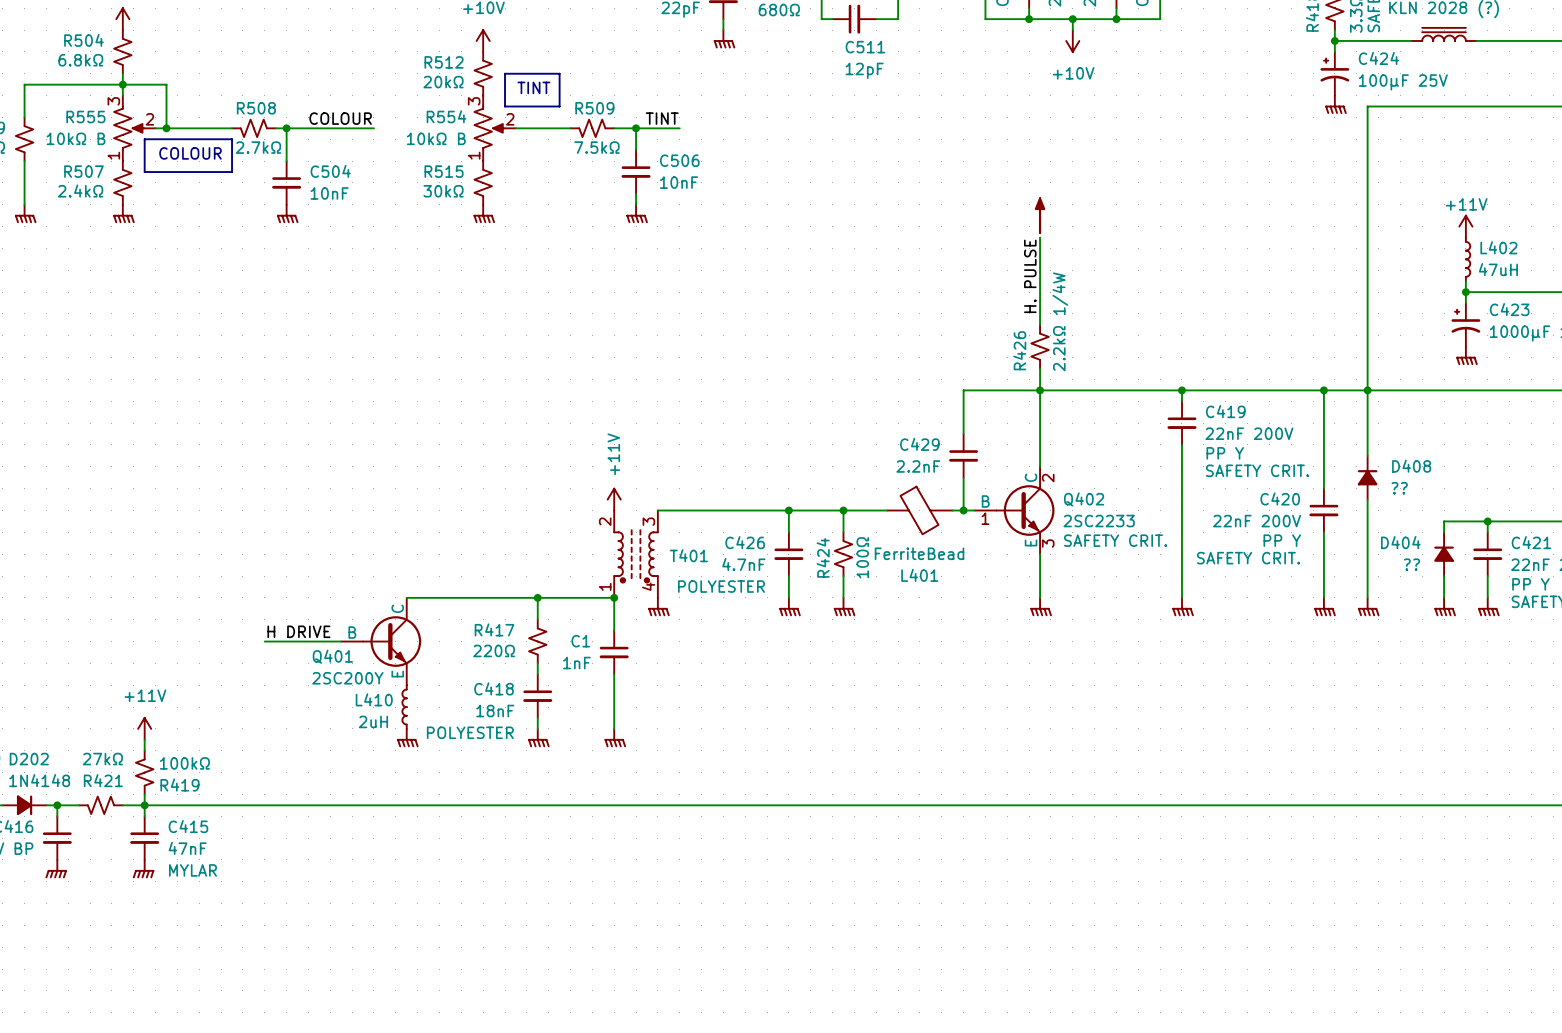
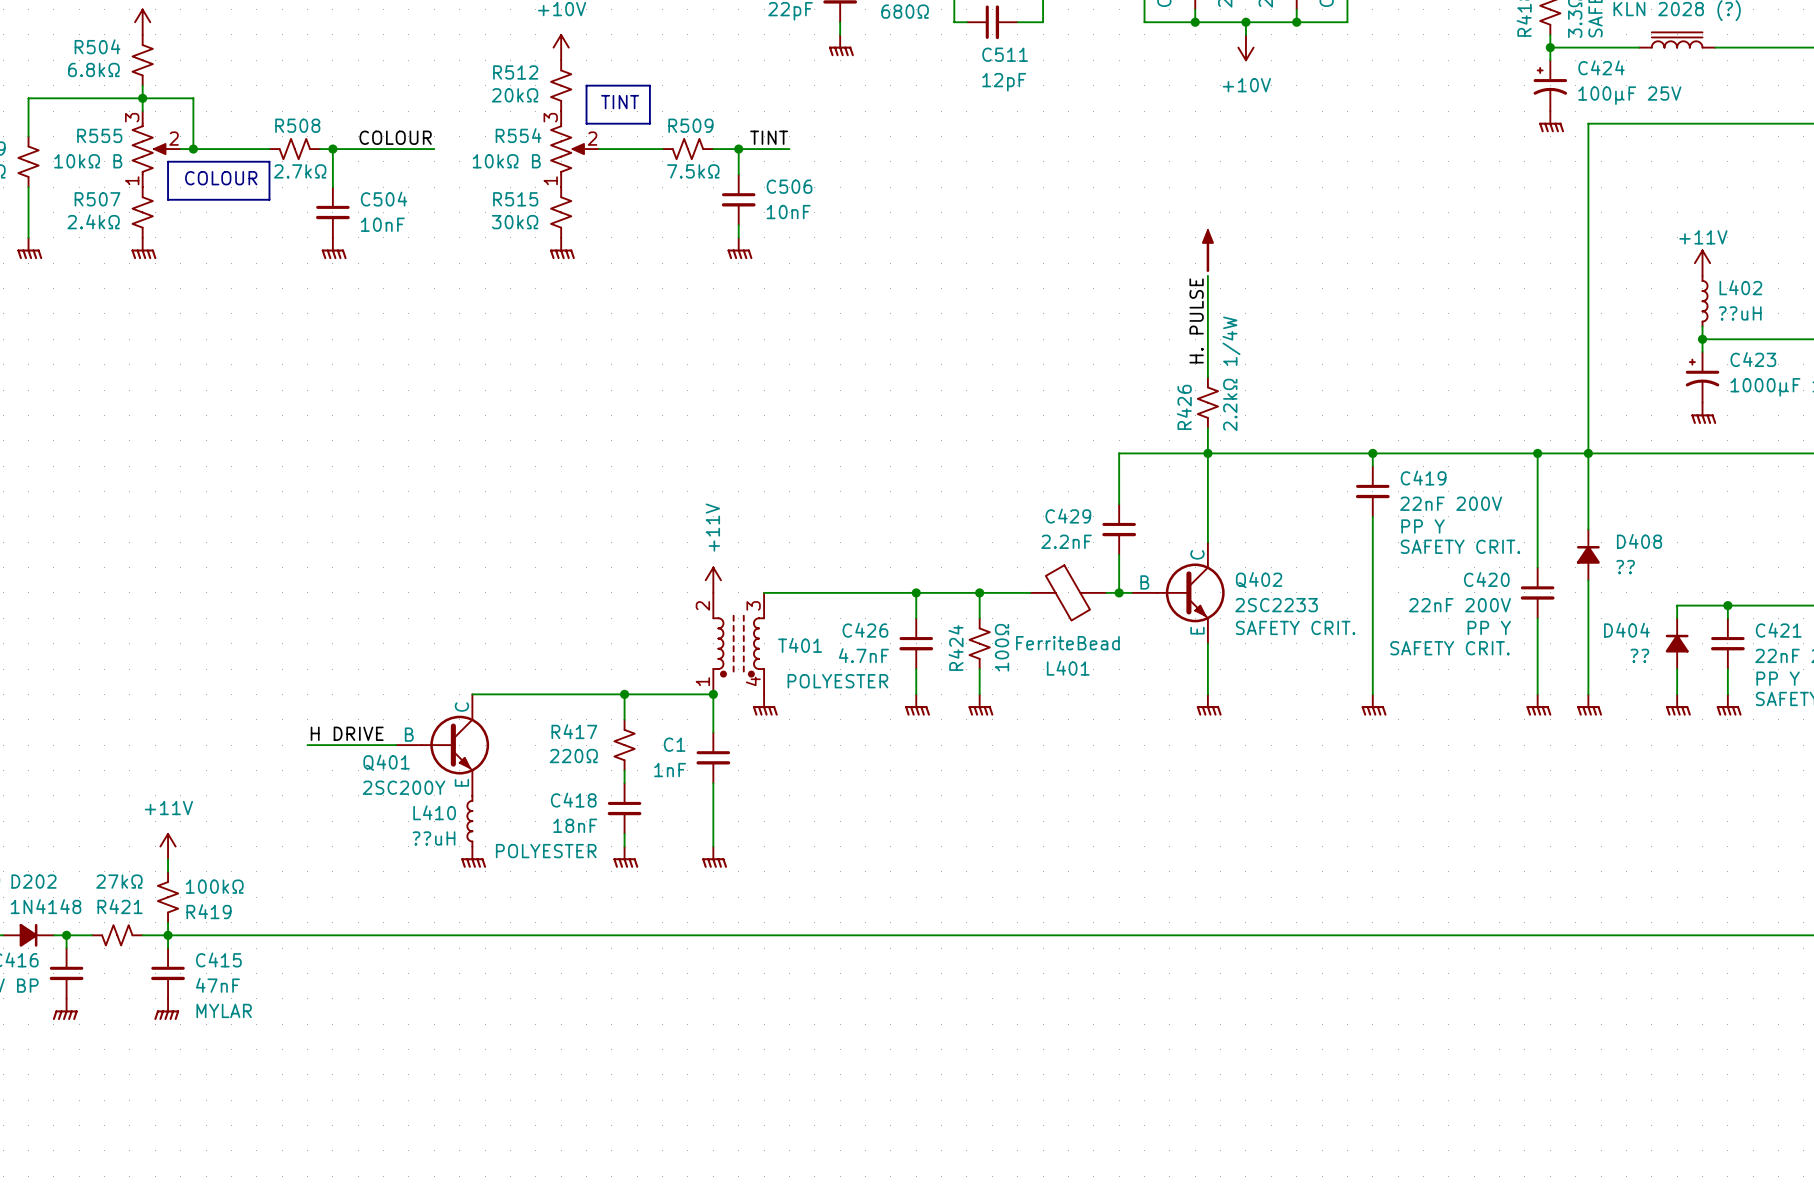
L402 value: 47uH (1498, 269) -> ??uH (1740, 313)
Q402 symbol: [974, 466, 1055, 555] -> [1131, 542, 1225, 644]
L410 value: 2uH (373, 721) -> ??uH (434, 838)

